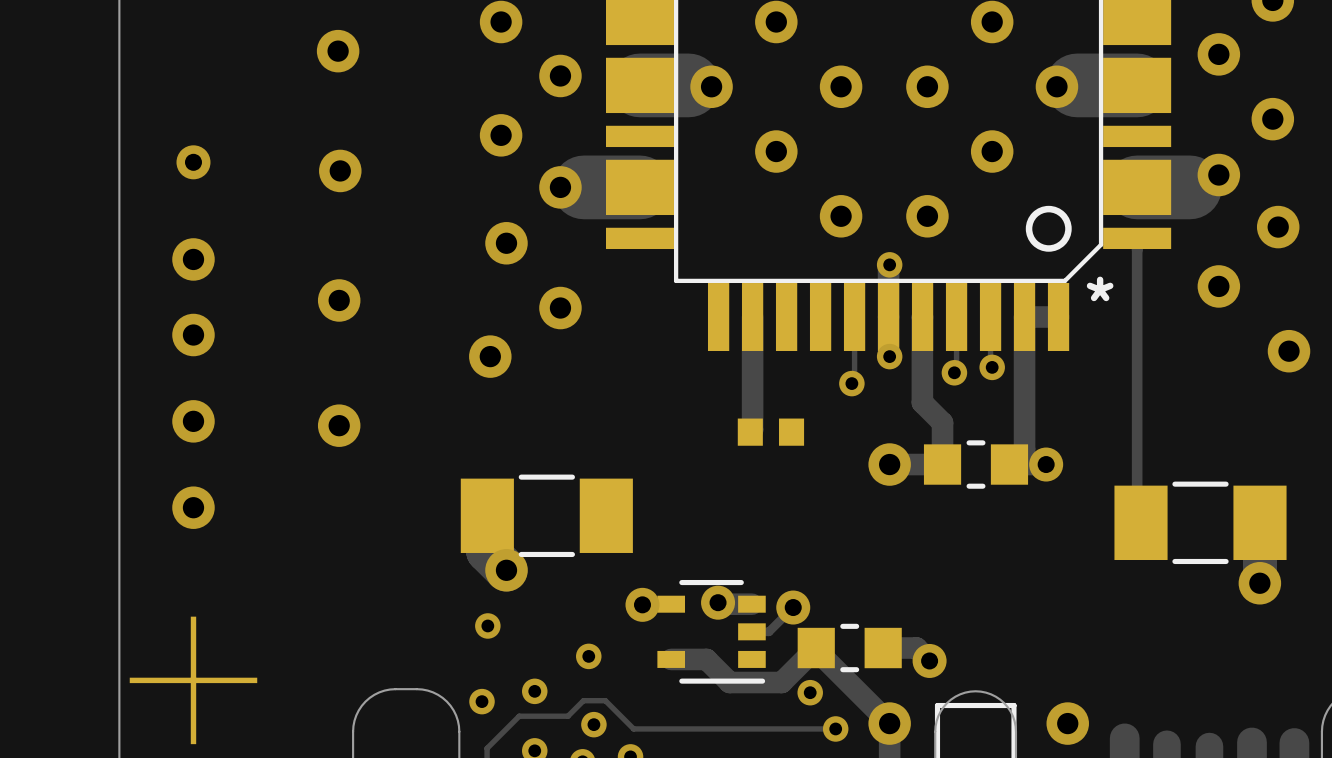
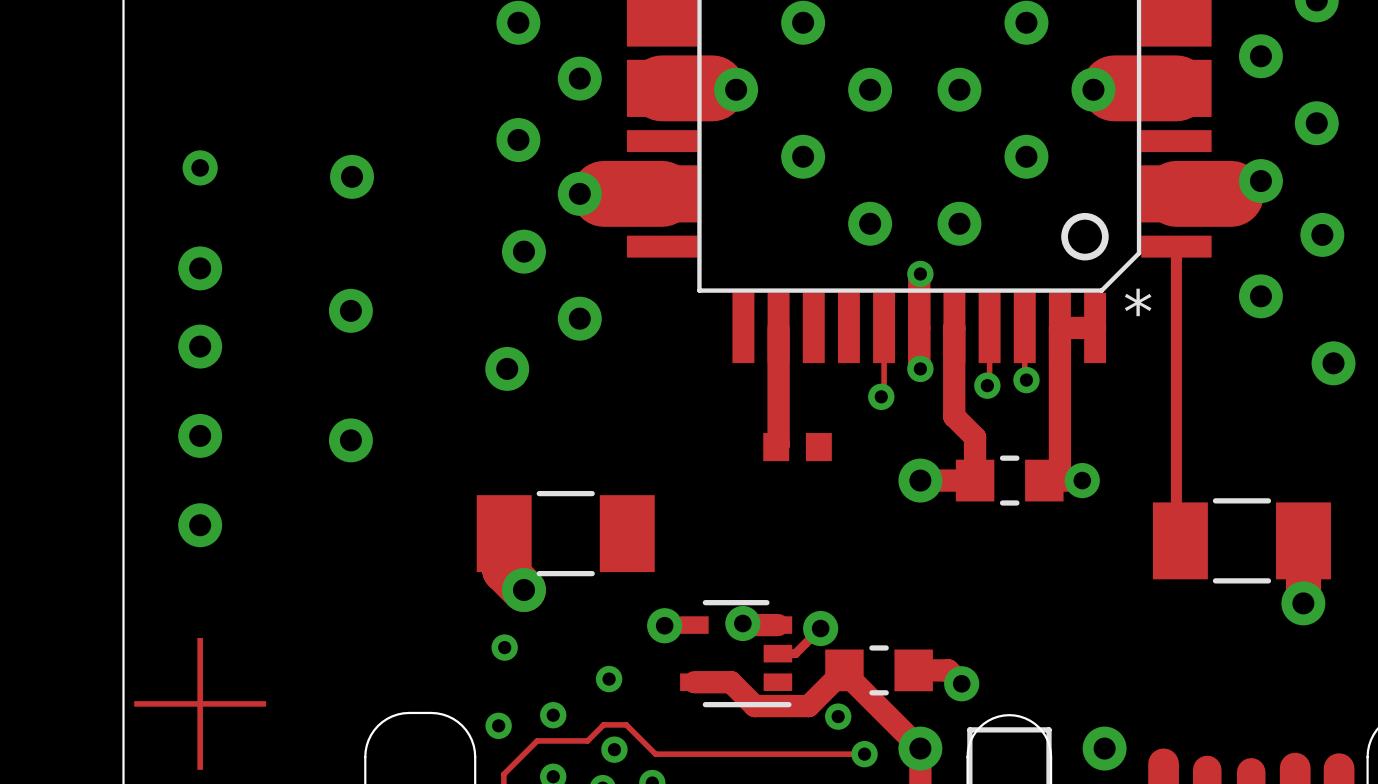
via: (338, 51) -> none

